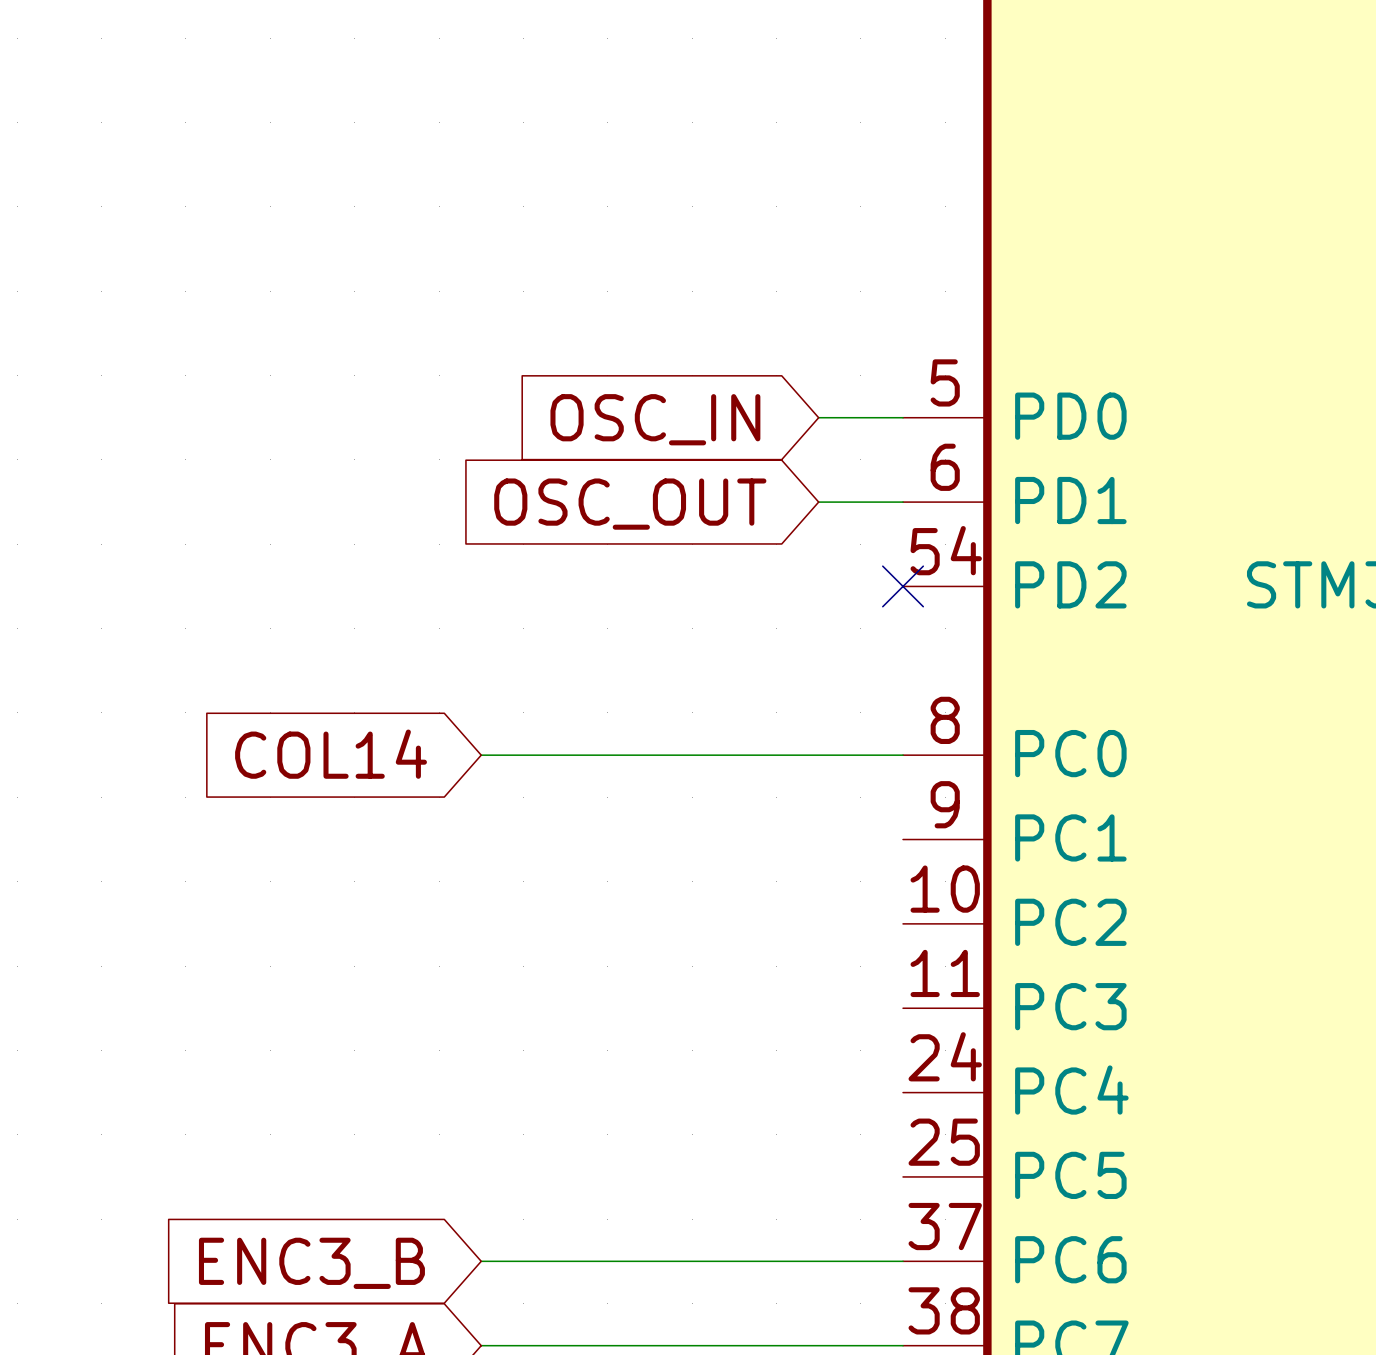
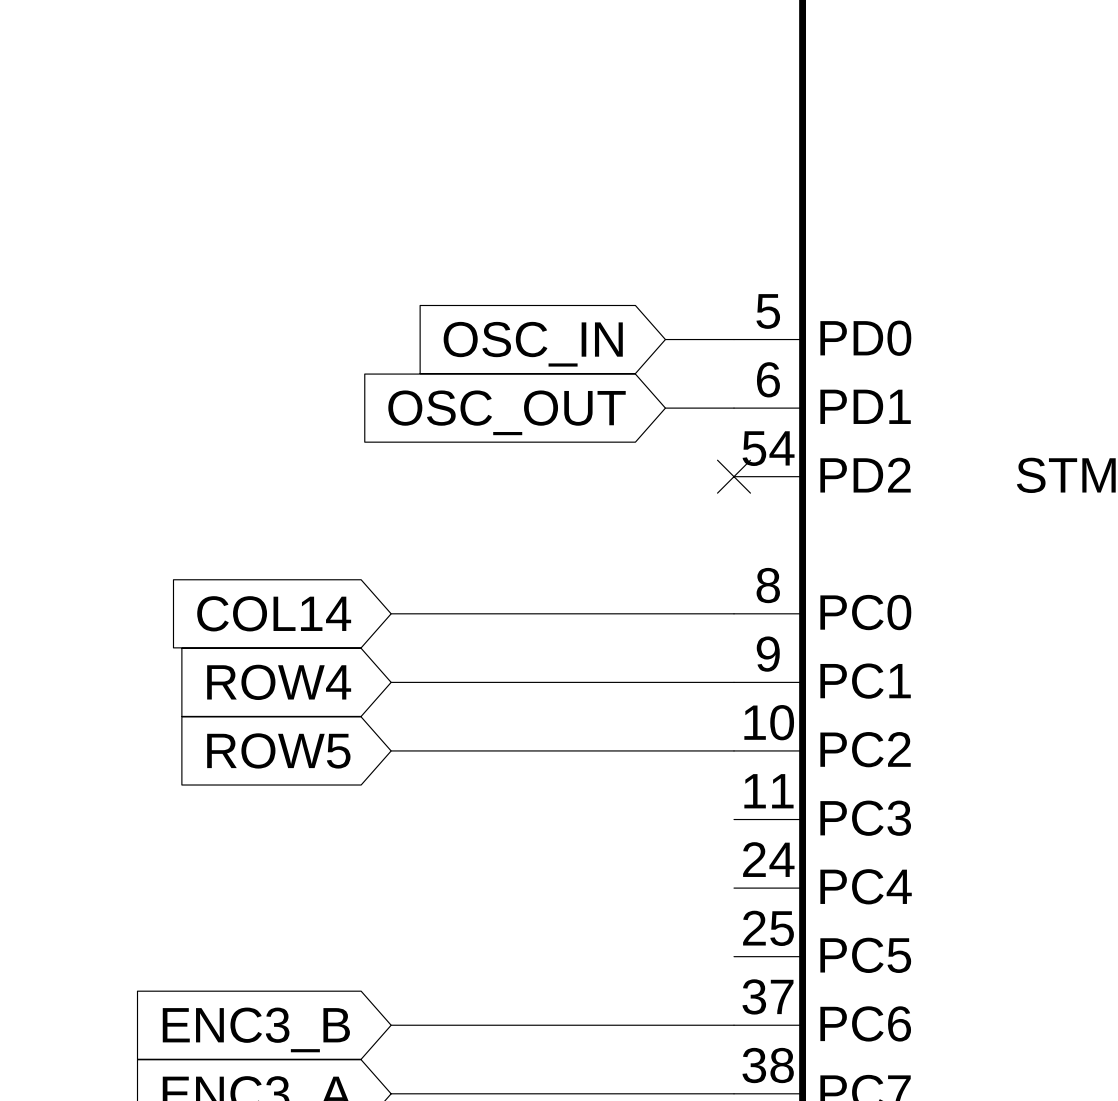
global label: none -> ROW4 (279, 682)
wire: none -> (391, 682) (734, 682)
global label: none -> ROW5 (278, 750)
wire: none -> (391, 750) (734, 750)

